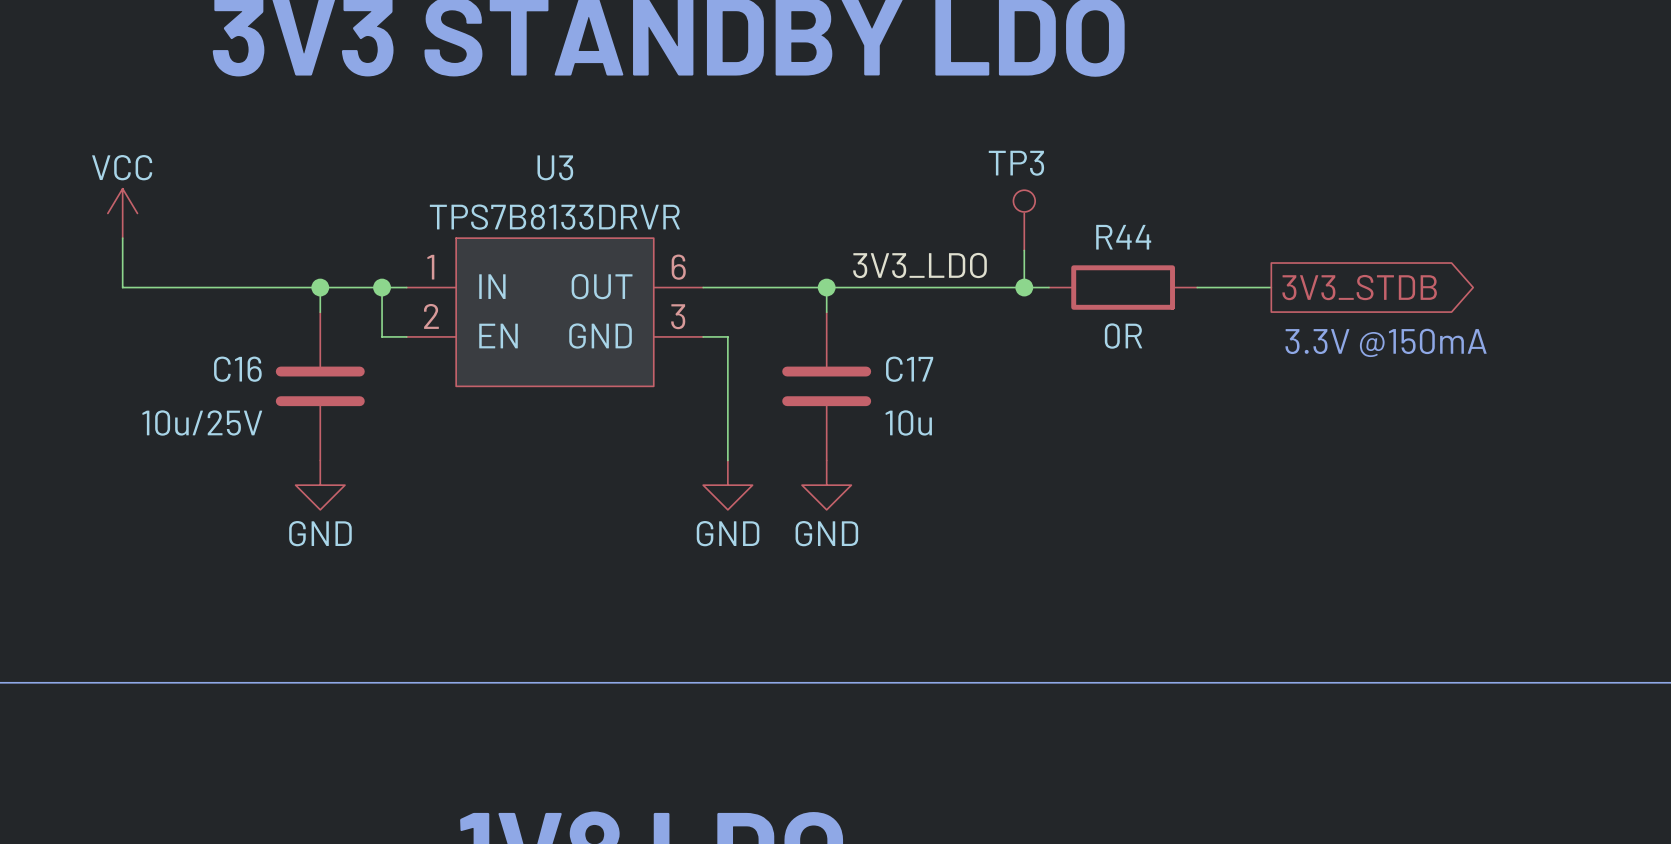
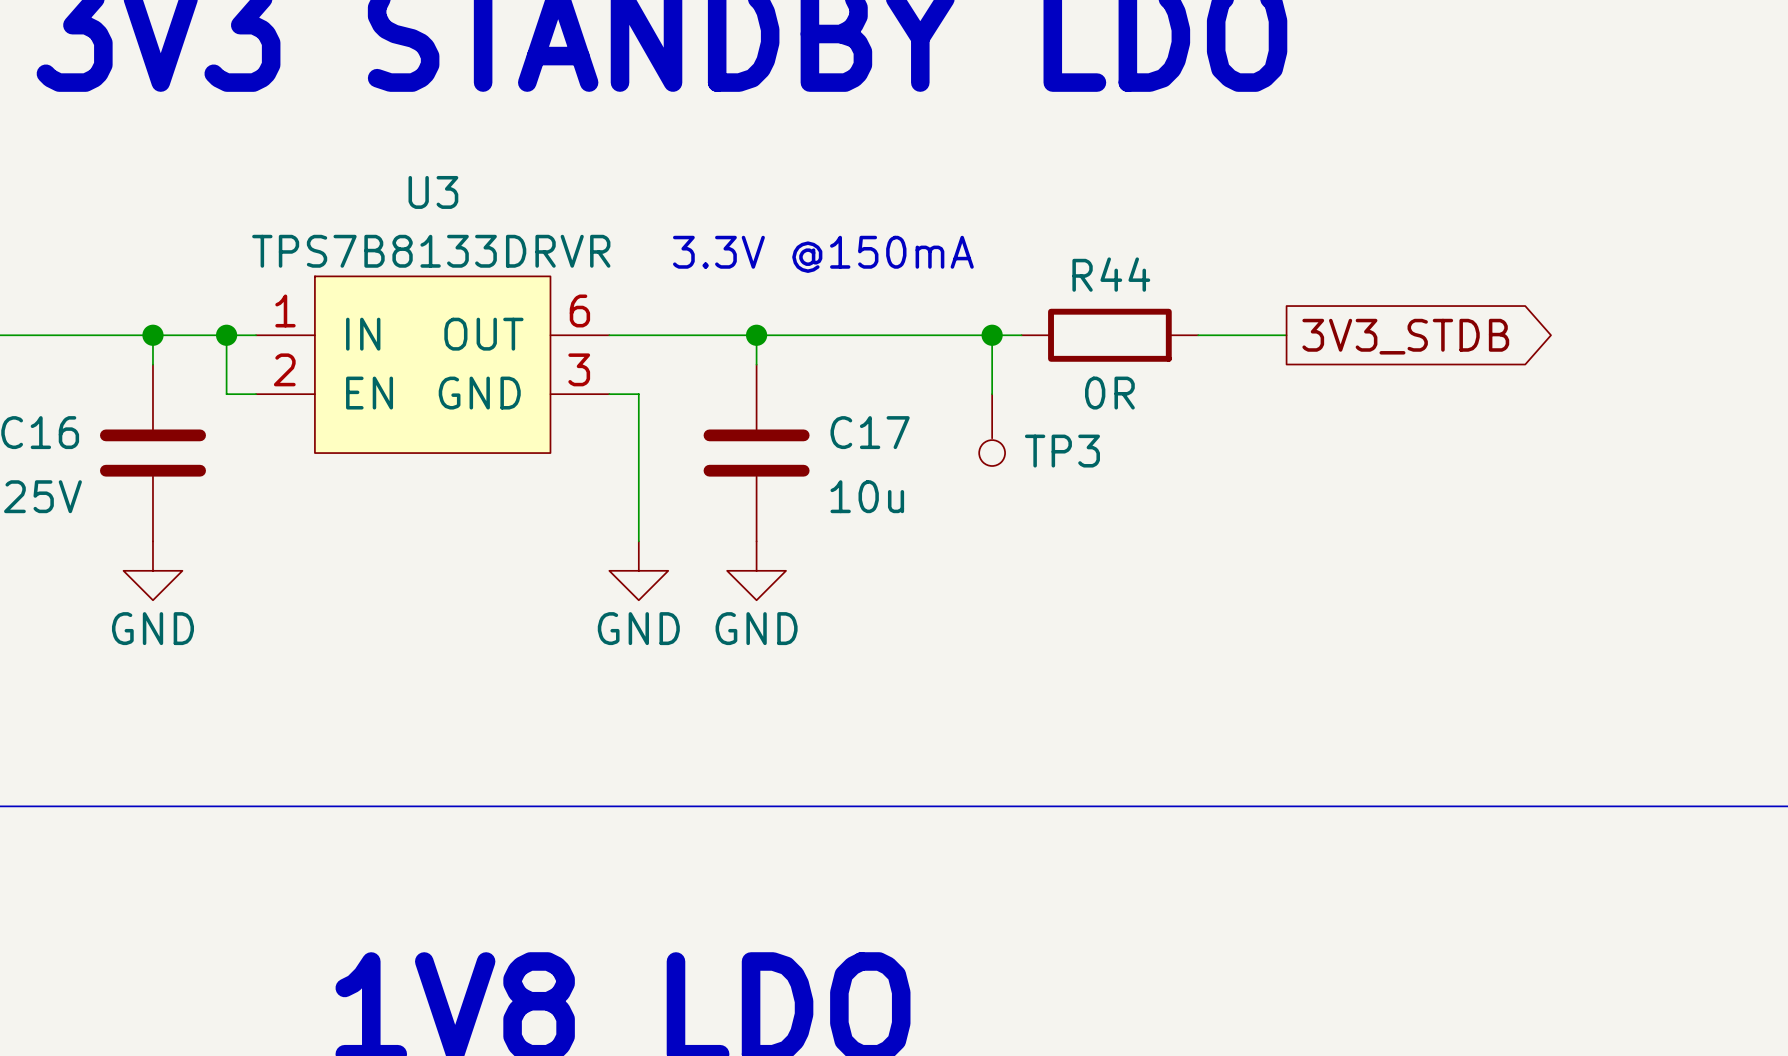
TP3 name position: TP3 (1016, 163) -> TP3 (1062, 451)
TP3 rotation: 0° (1024, 201) -> 180° (992, 453)
text: none -> 3.3V @150mA (823, 254)
TP3 position: (1024, 220) -> (992, 430)
wire: (1024, 250) (1024, 287) -> (992, 394) (992, 335)
label: 3V3_LDO (919, 265) -> none
text: 3.3V @150mA (1386, 342) -> none

